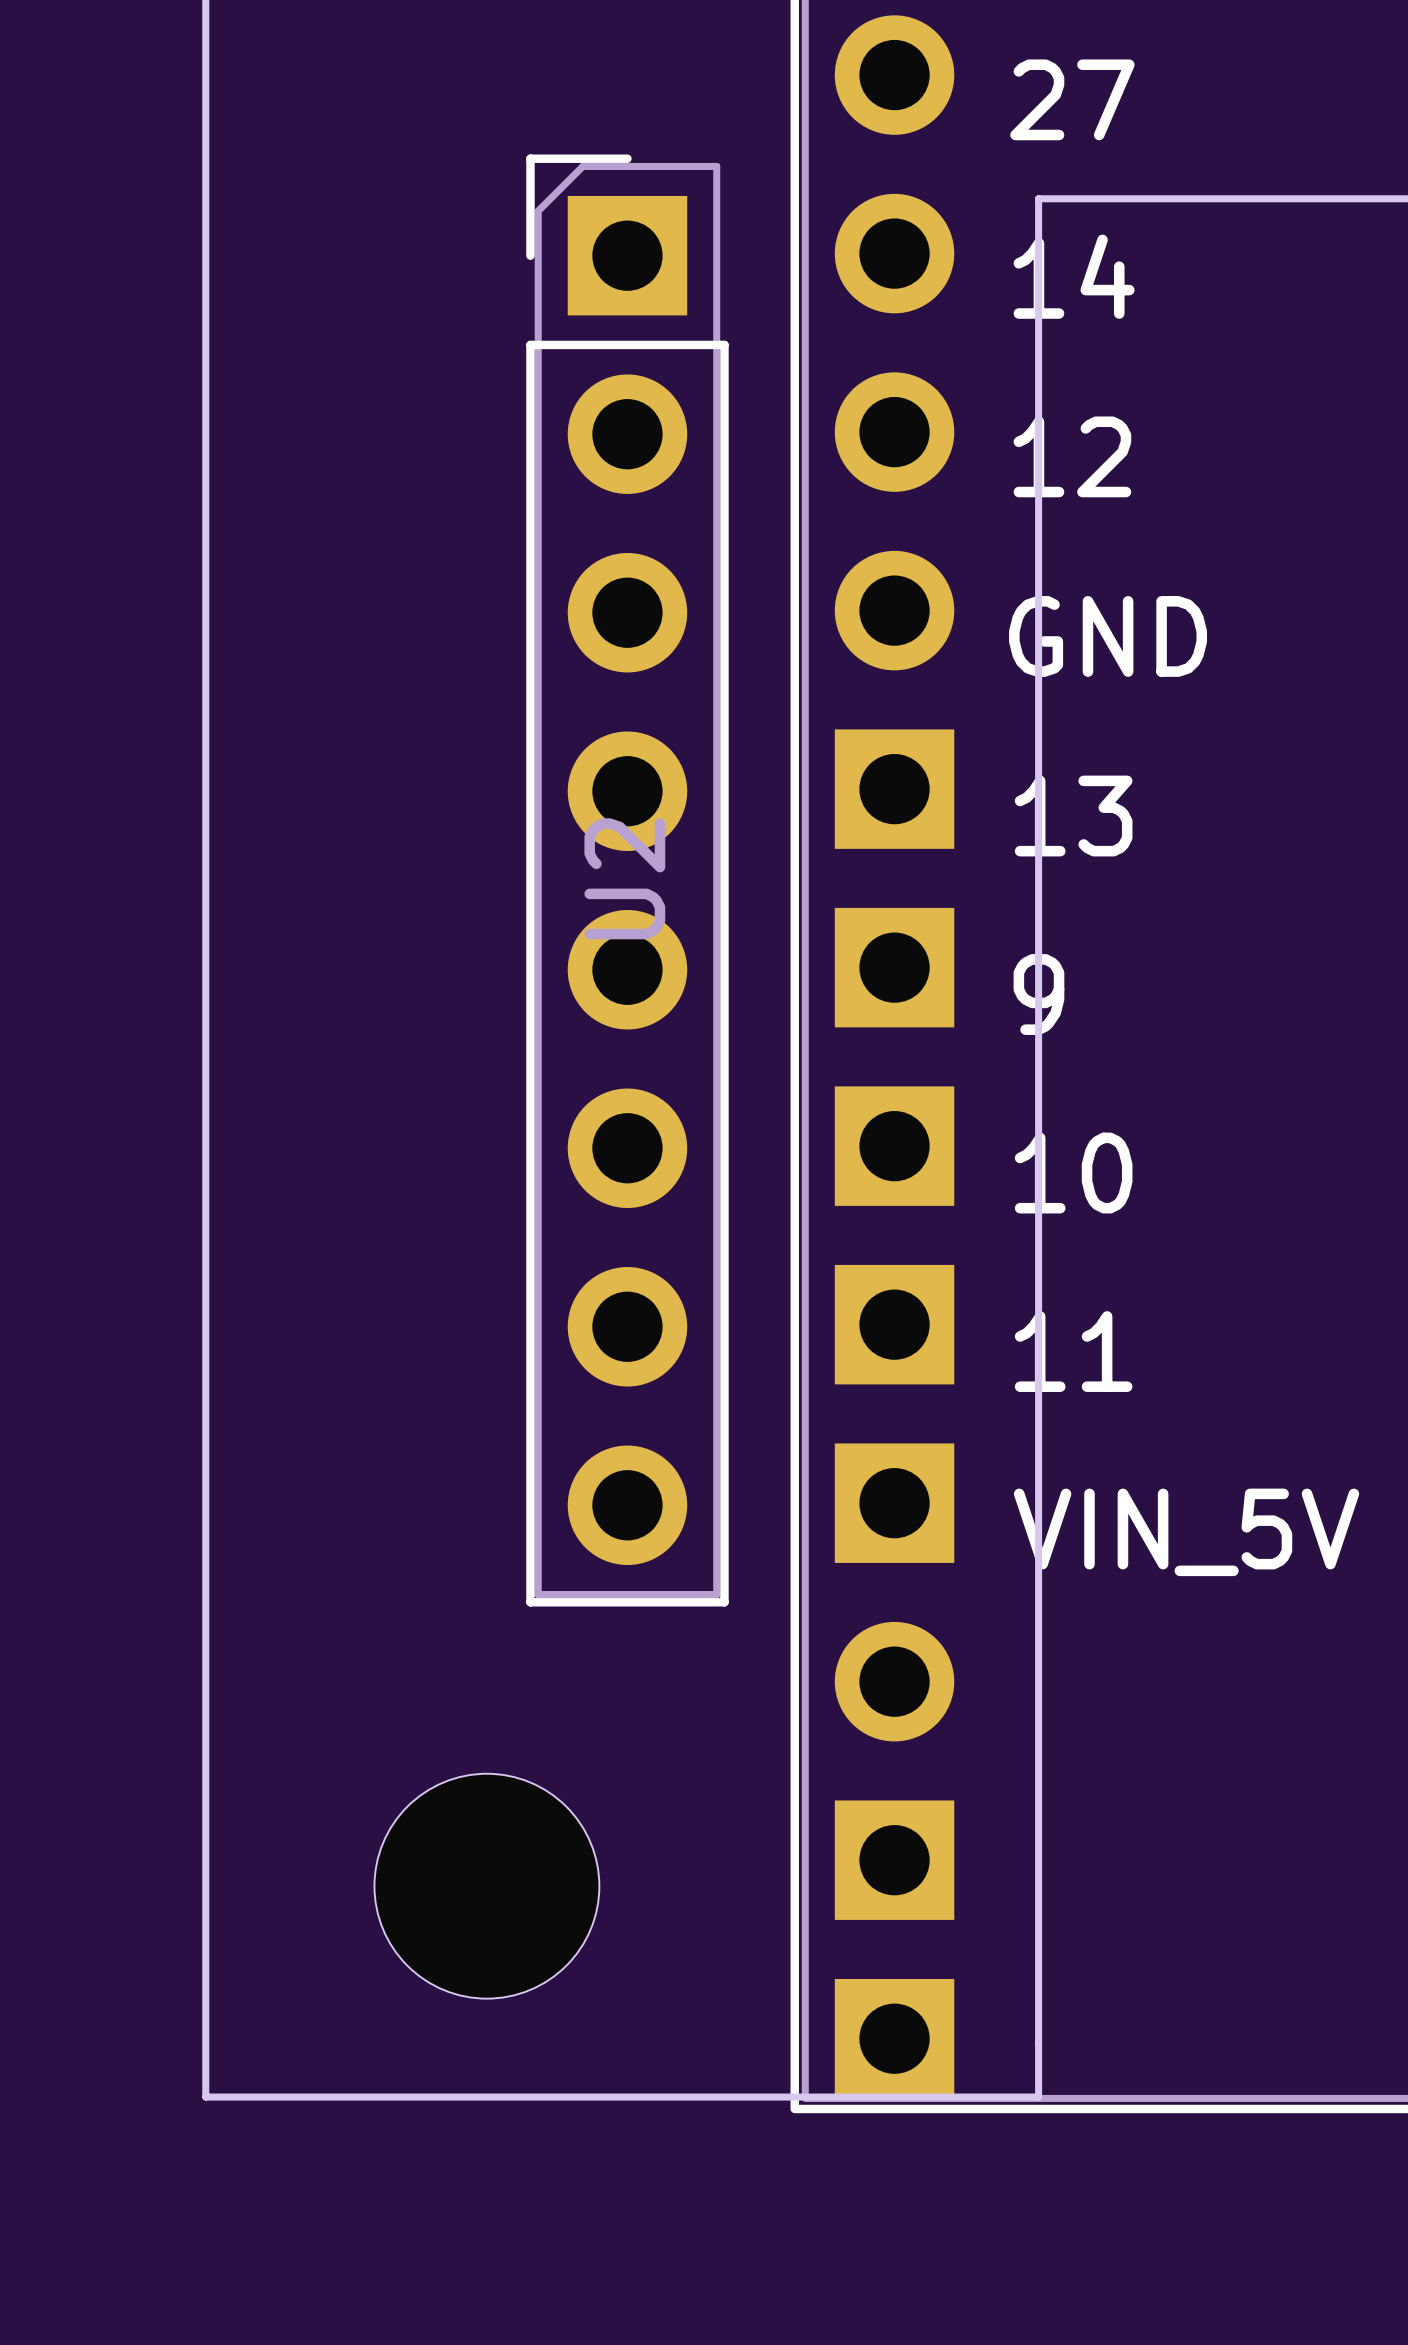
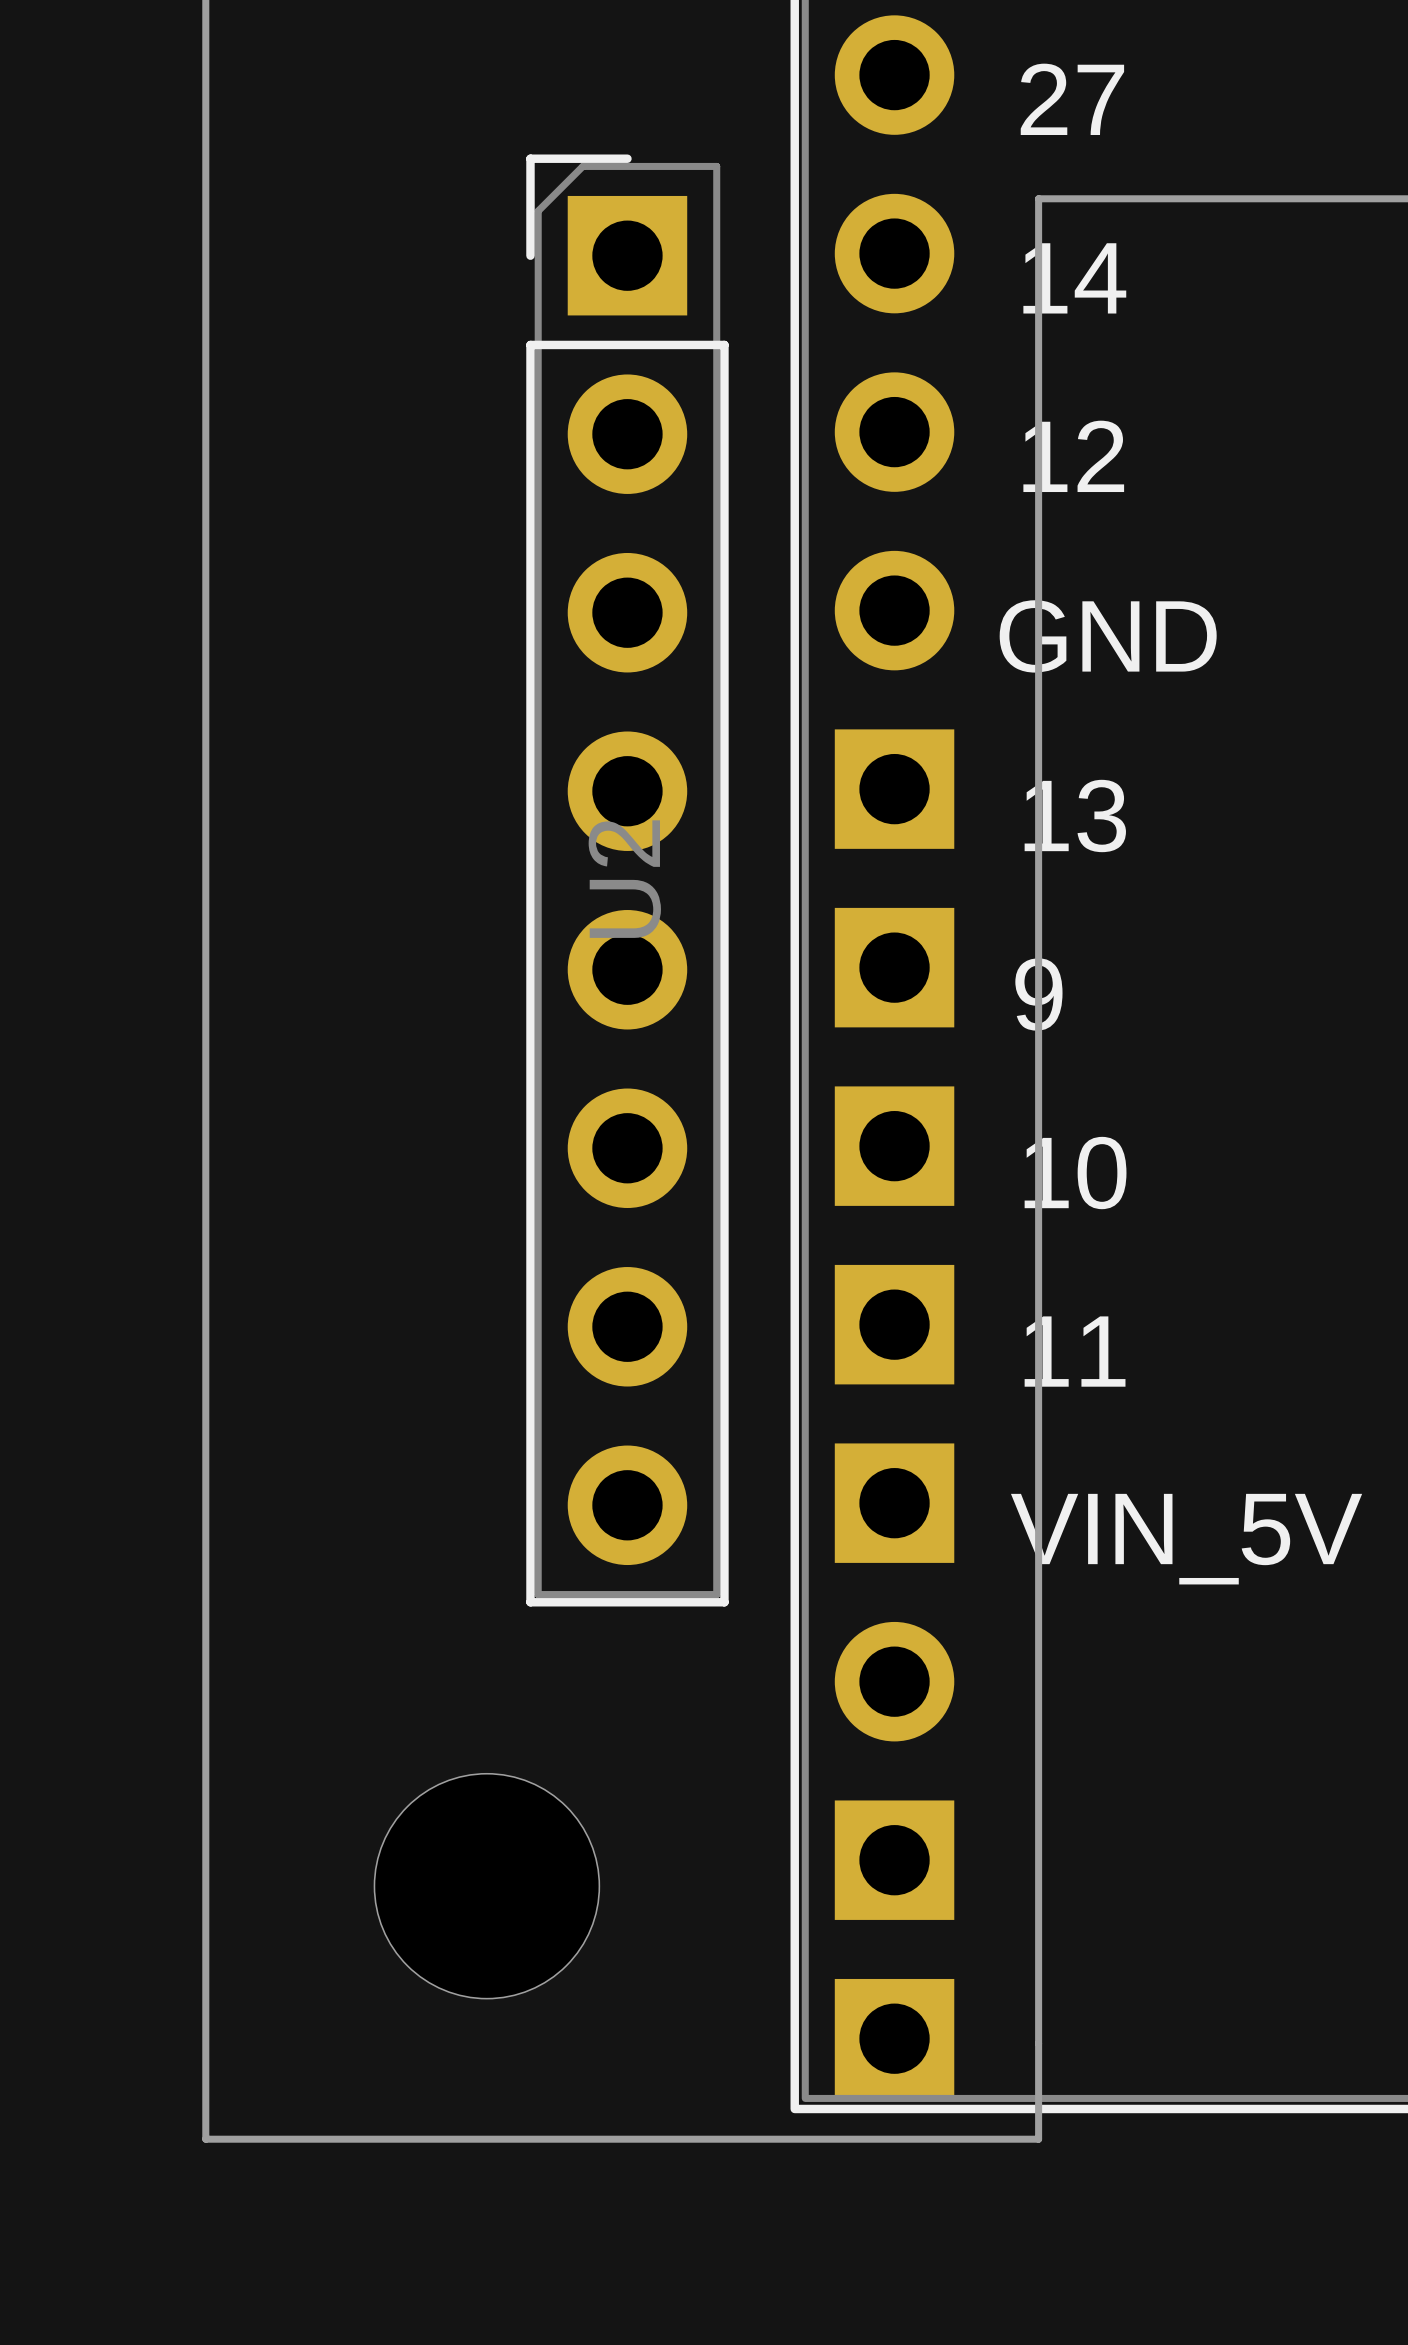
board edge: (205, 2097) (1038, 2097) -> (205, 2097) (205, 2139) (1038, 2139) (1038, 2097)

